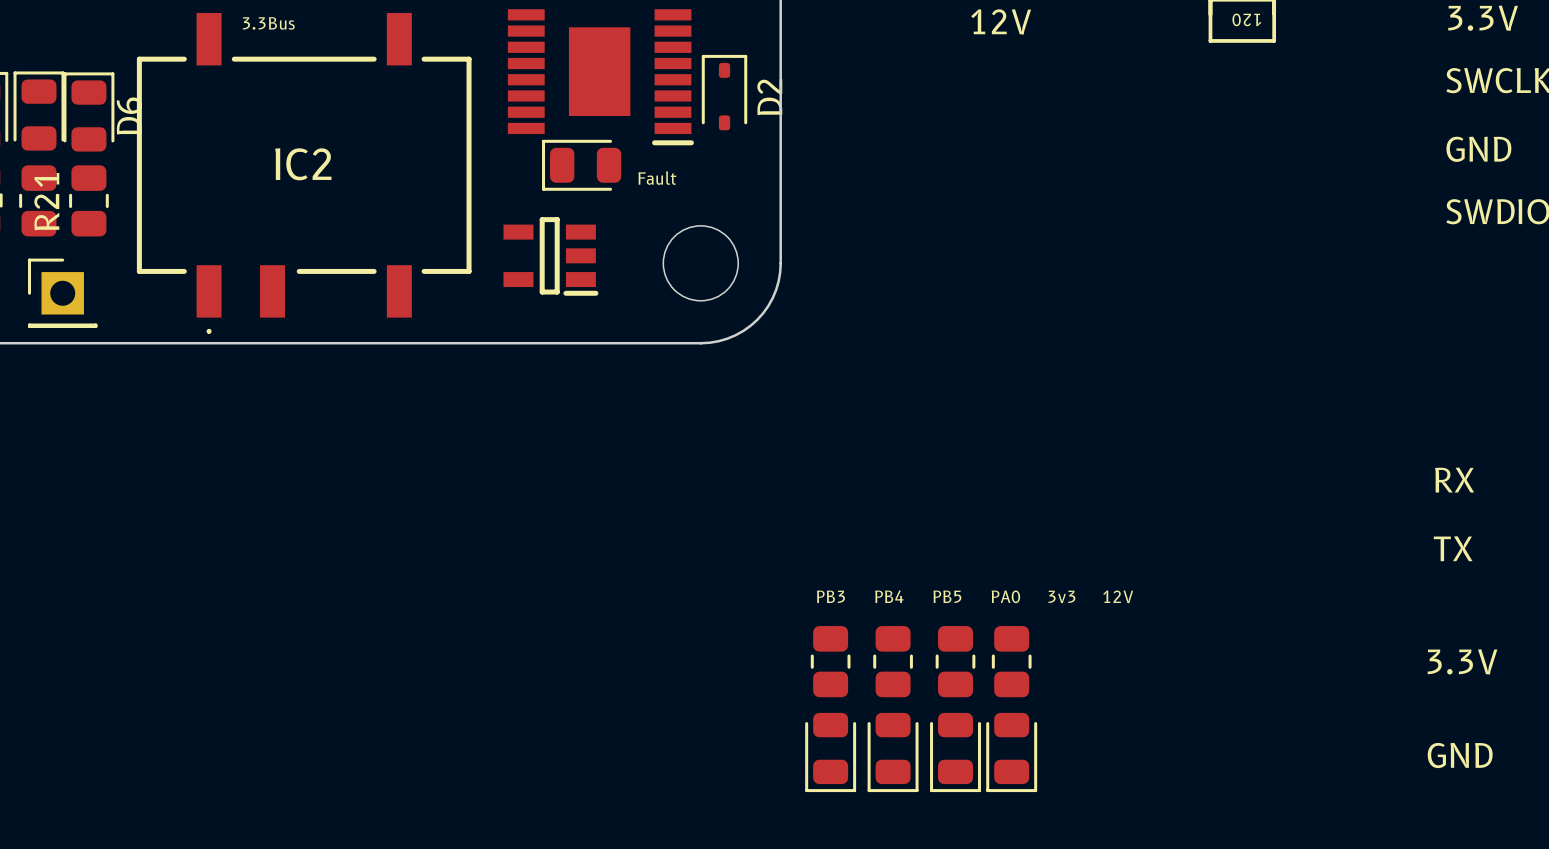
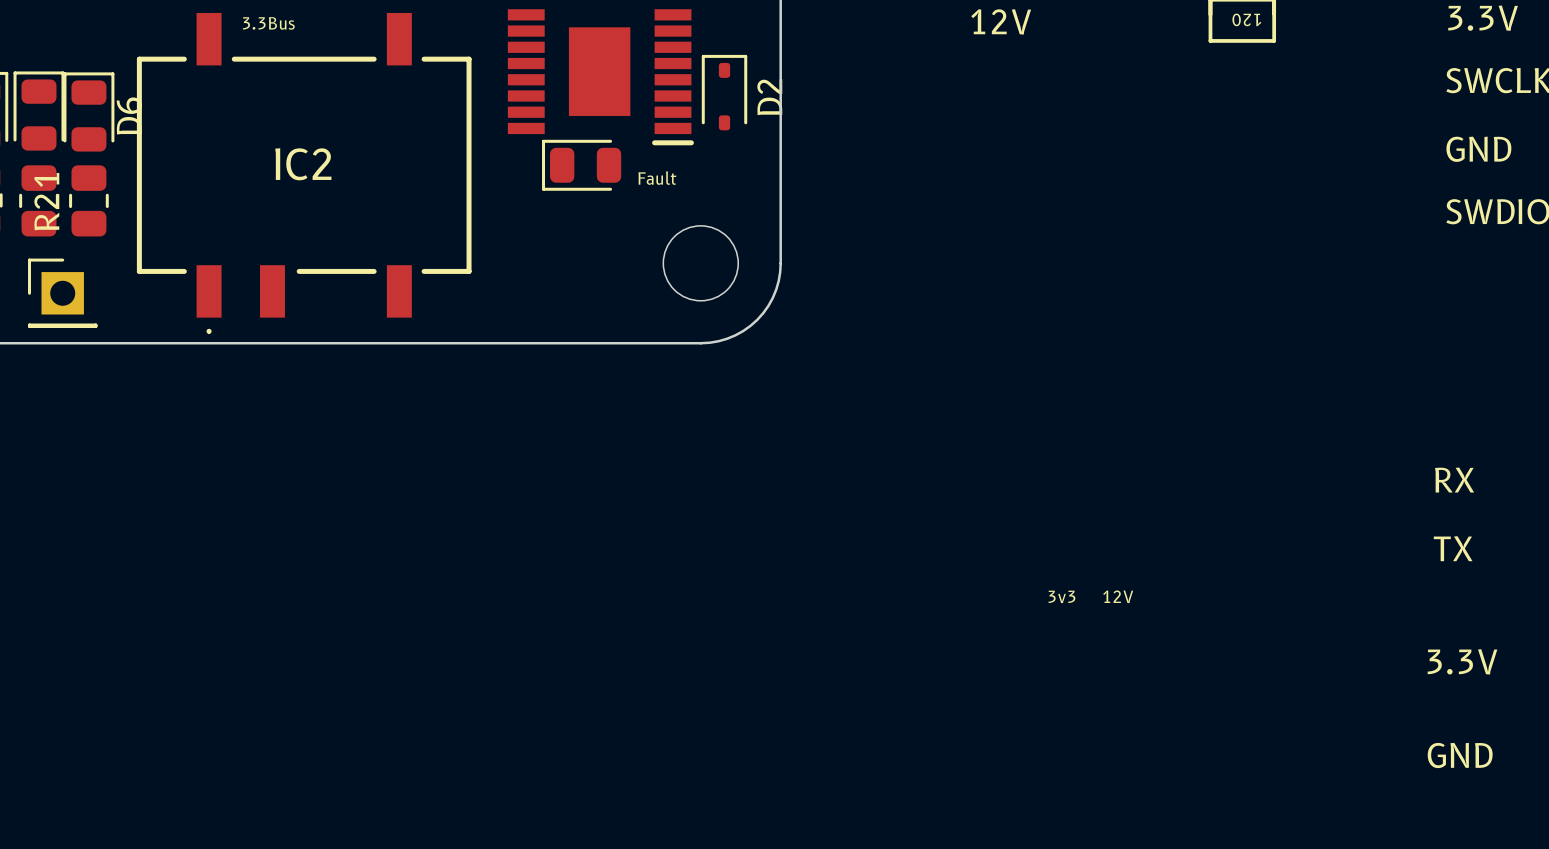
part: (550, 256) -> none
text: PB3 (830, 596) -> none
text: PB4 (889, 596) -> none
text: PB5 (947, 596) -> none
text: PA0 (1005, 596) -> none
part: (830, 661) -> none
part: (893, 661) -> none
part: (955, 661) -> none
part: (1011, 661) -> none
part: (830, 752) -> none
part: (893, 752) -> none
part: (955, 752) -> none
part: (1011, 752) -> none

